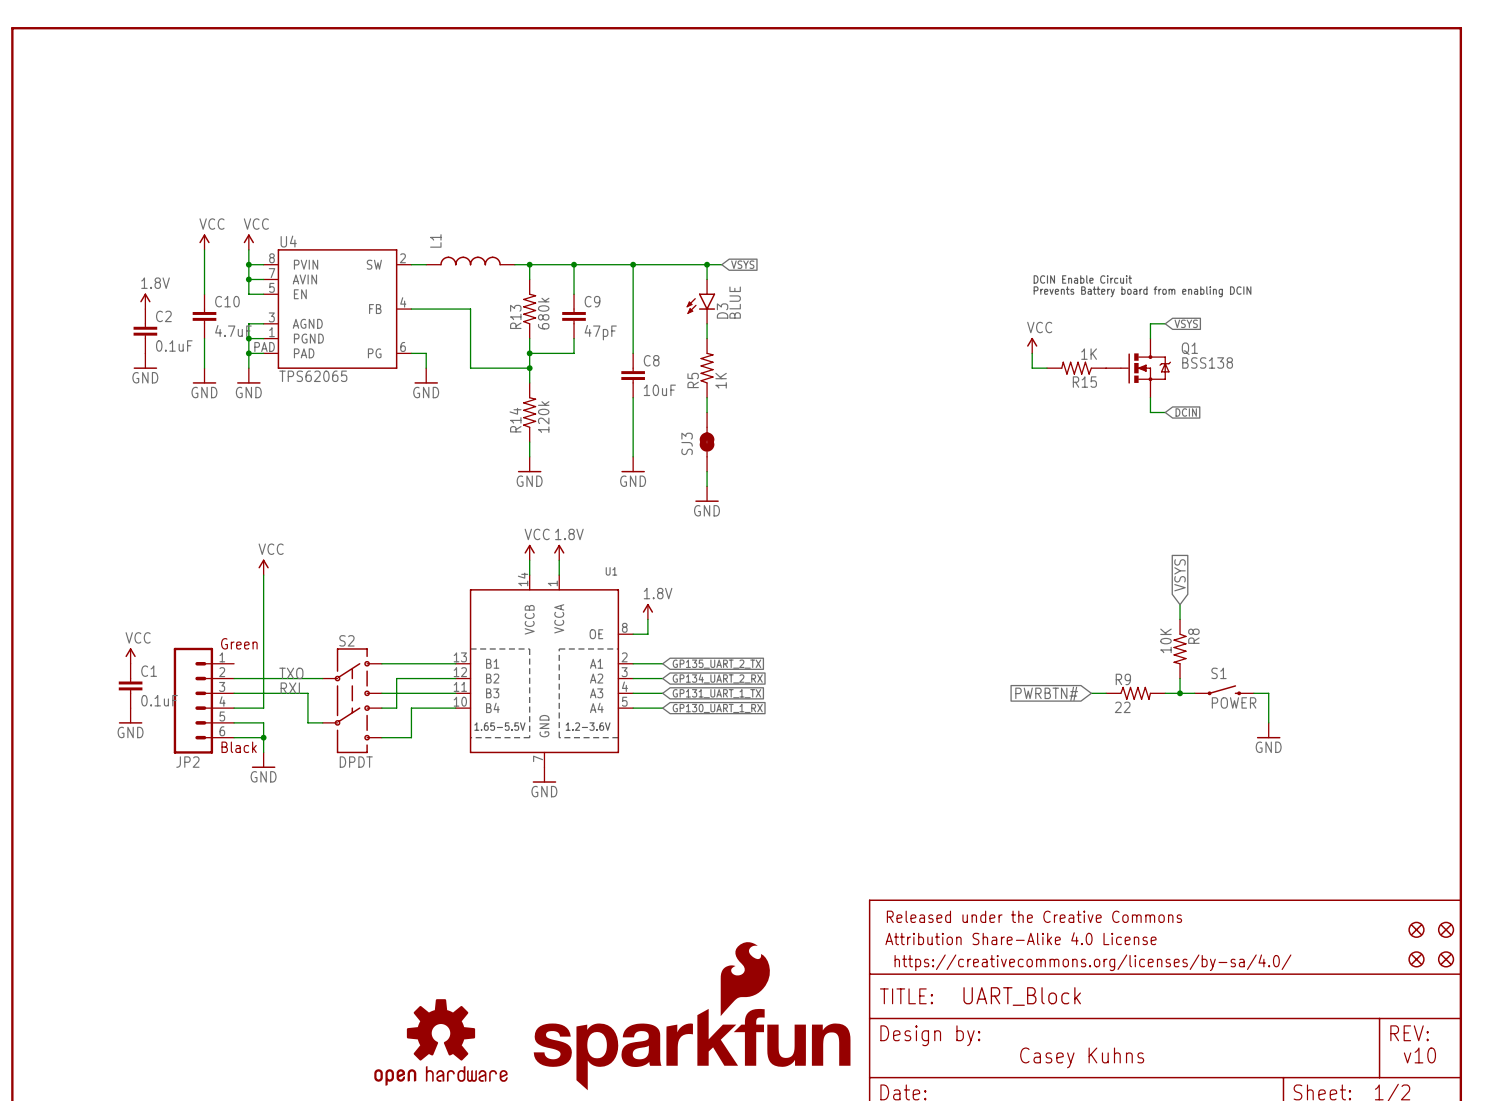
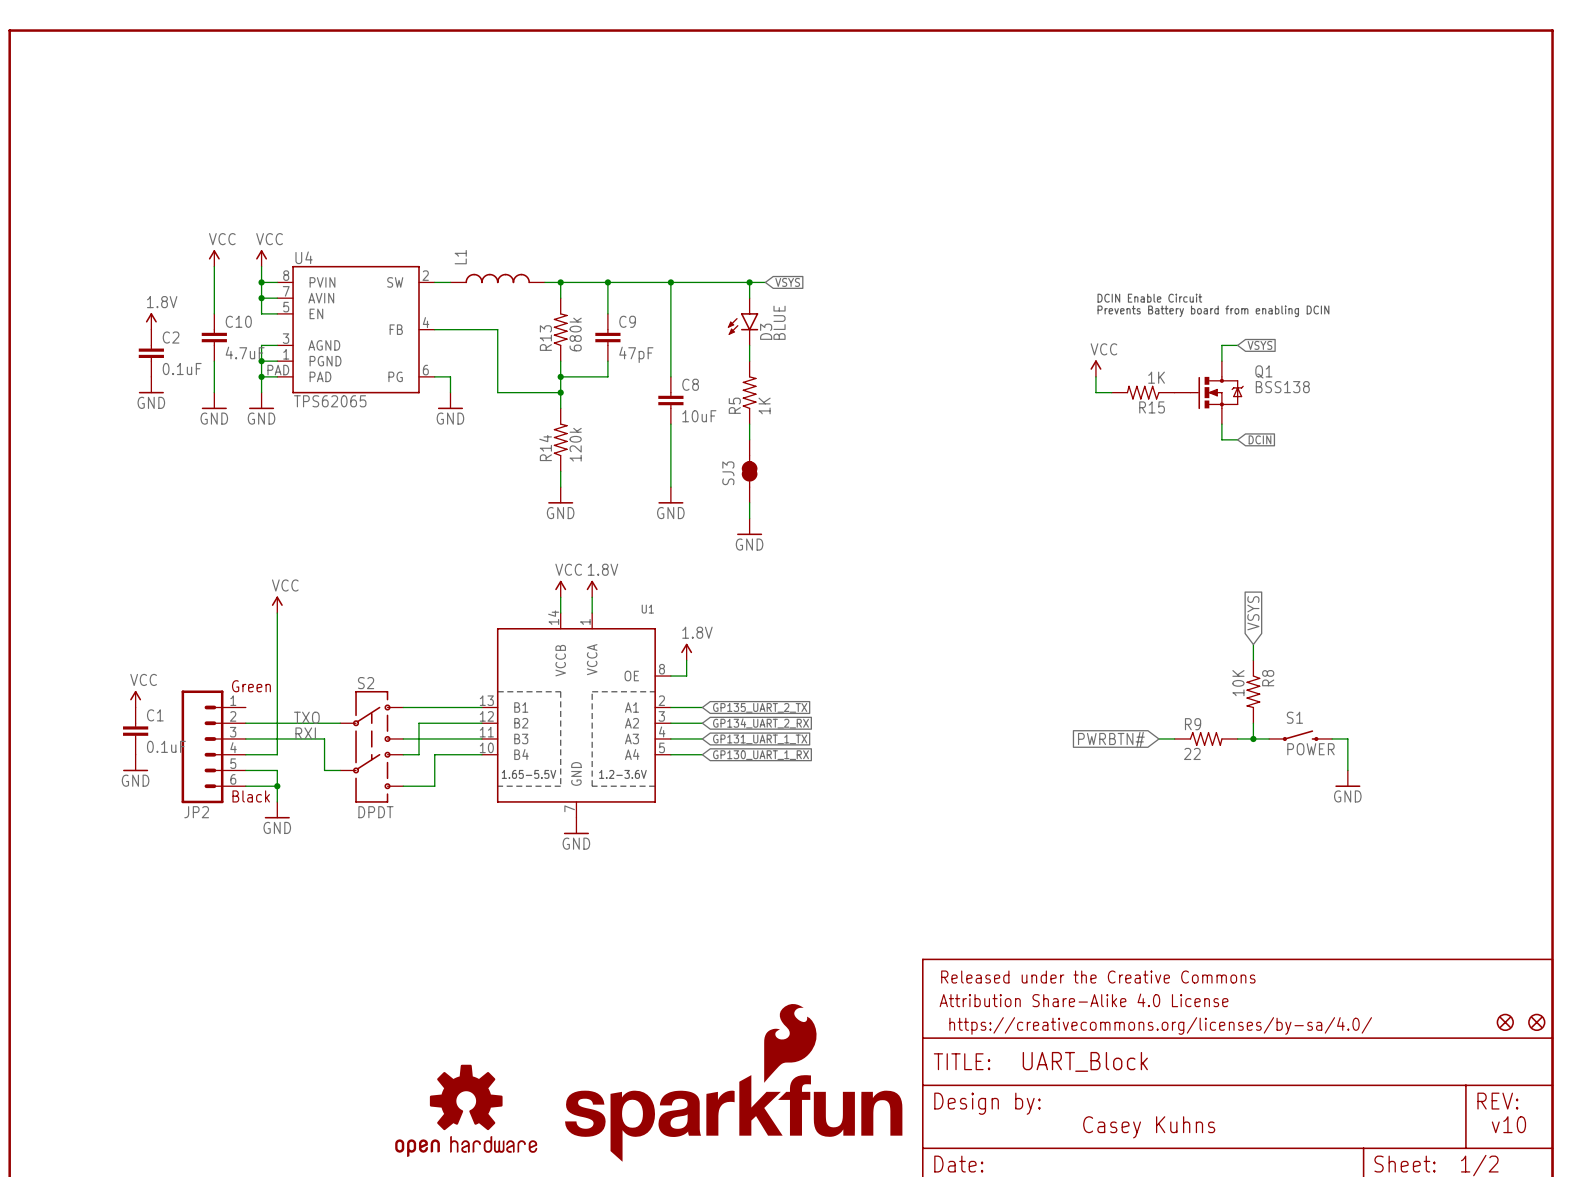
part: (1416, 929) -> none
part: (1446, 929) -> none

